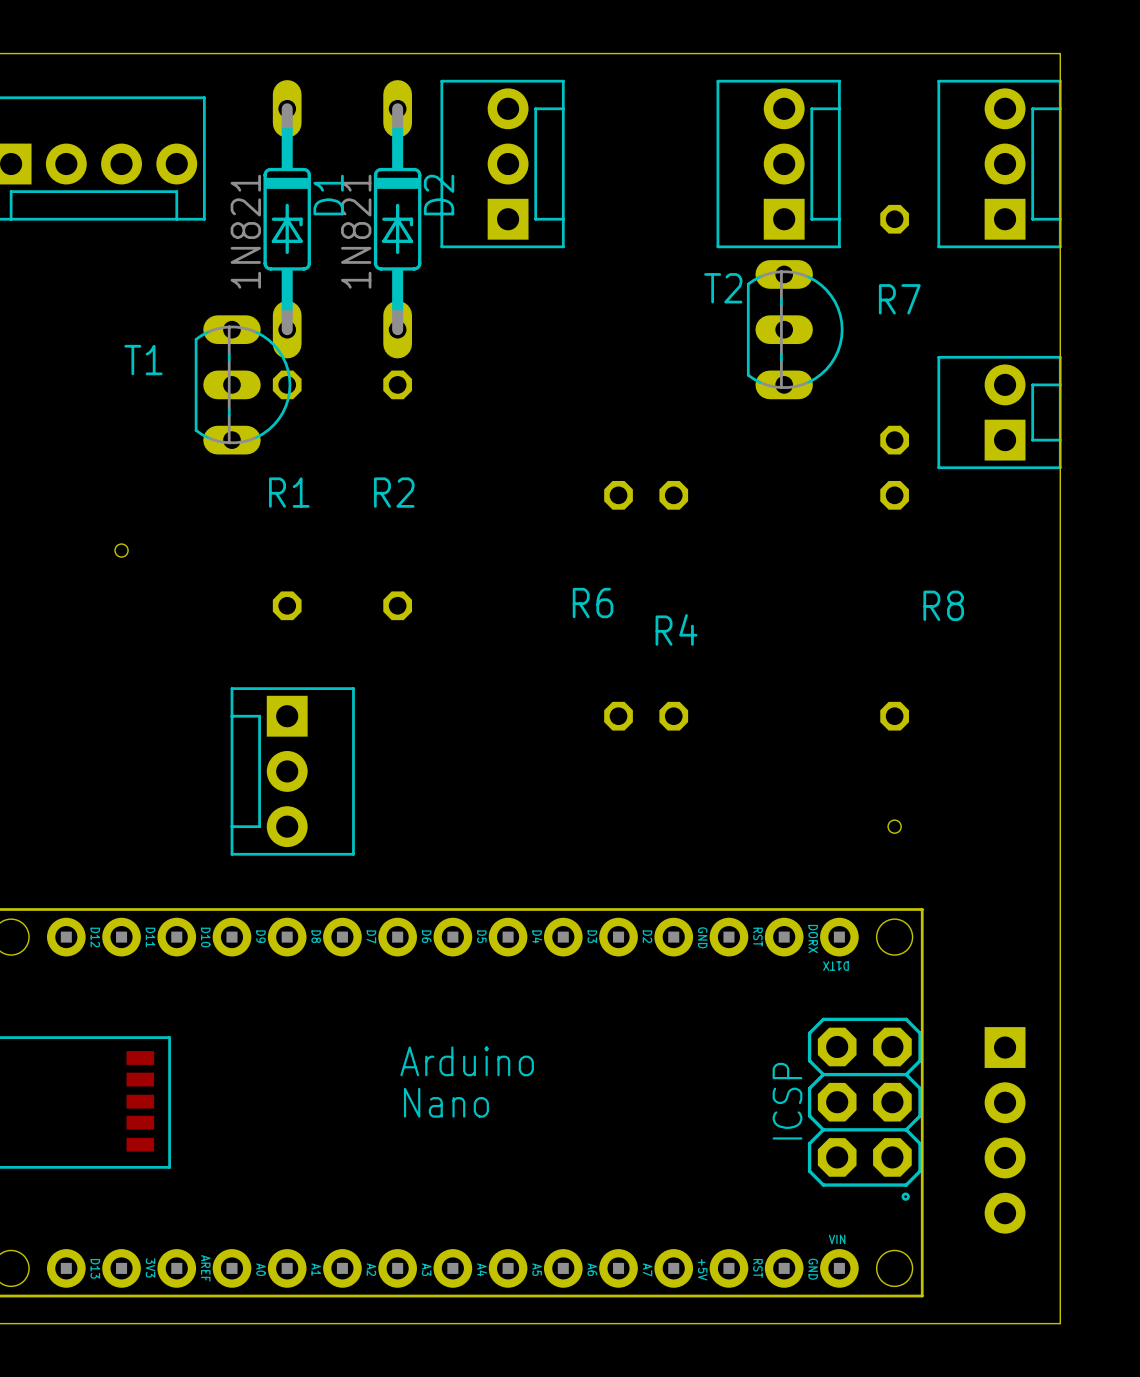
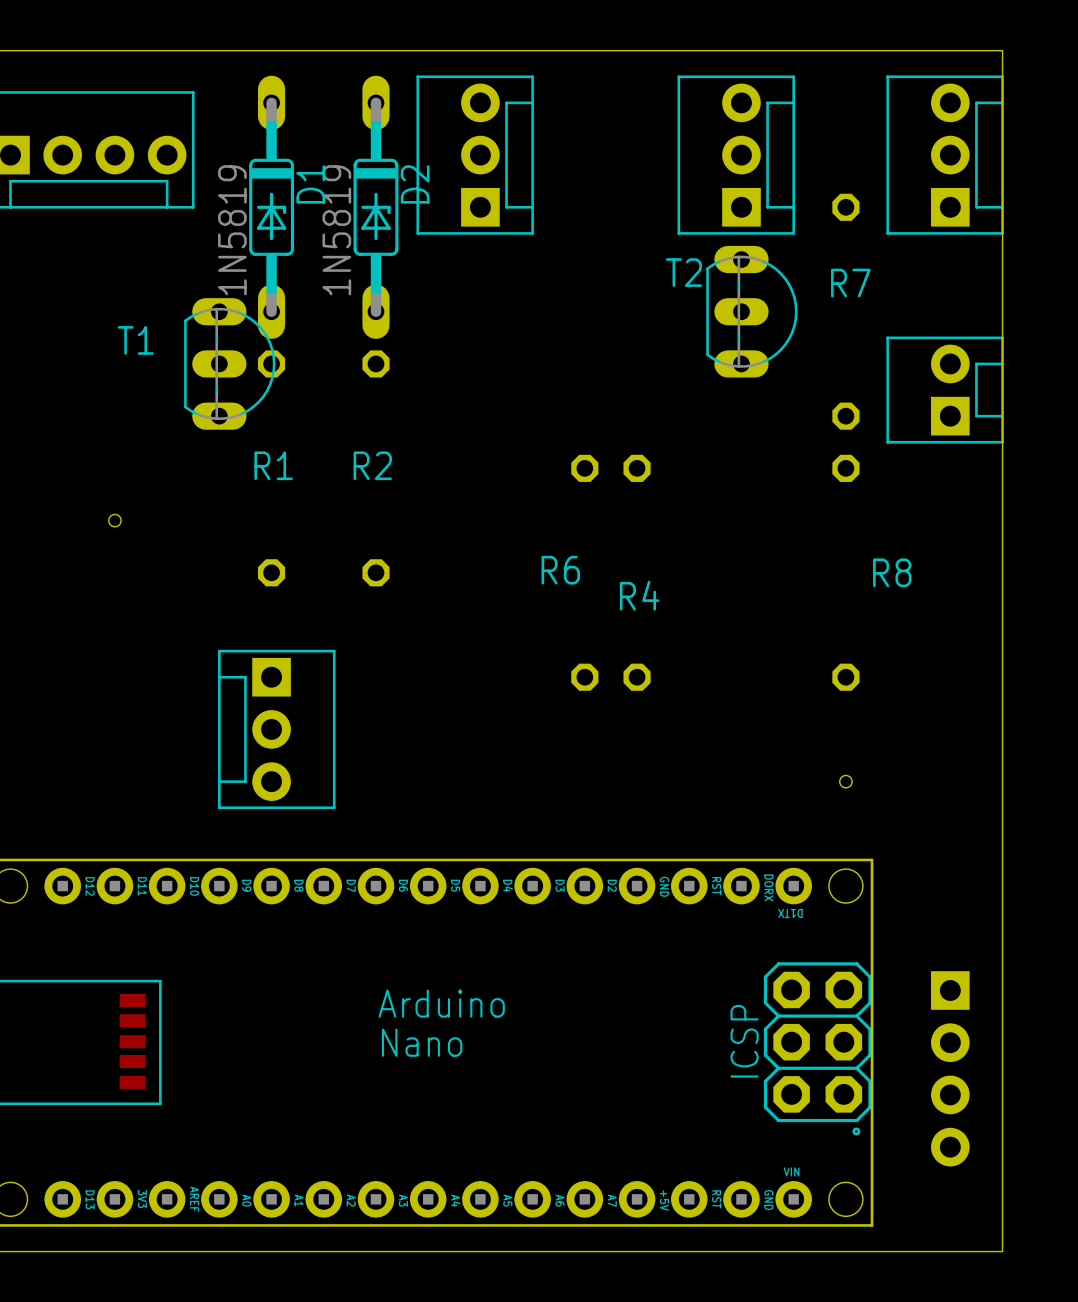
D1 value: 1N821 (245, 231) -> 1N5819 (232, 230)
D2 value: 1N821 (356, 231) -> 1N5819 (336, 230)

